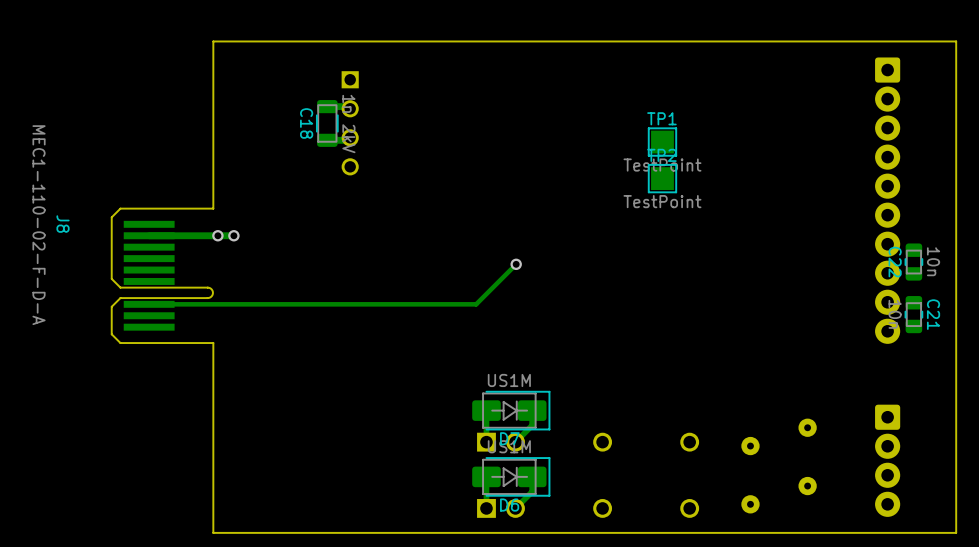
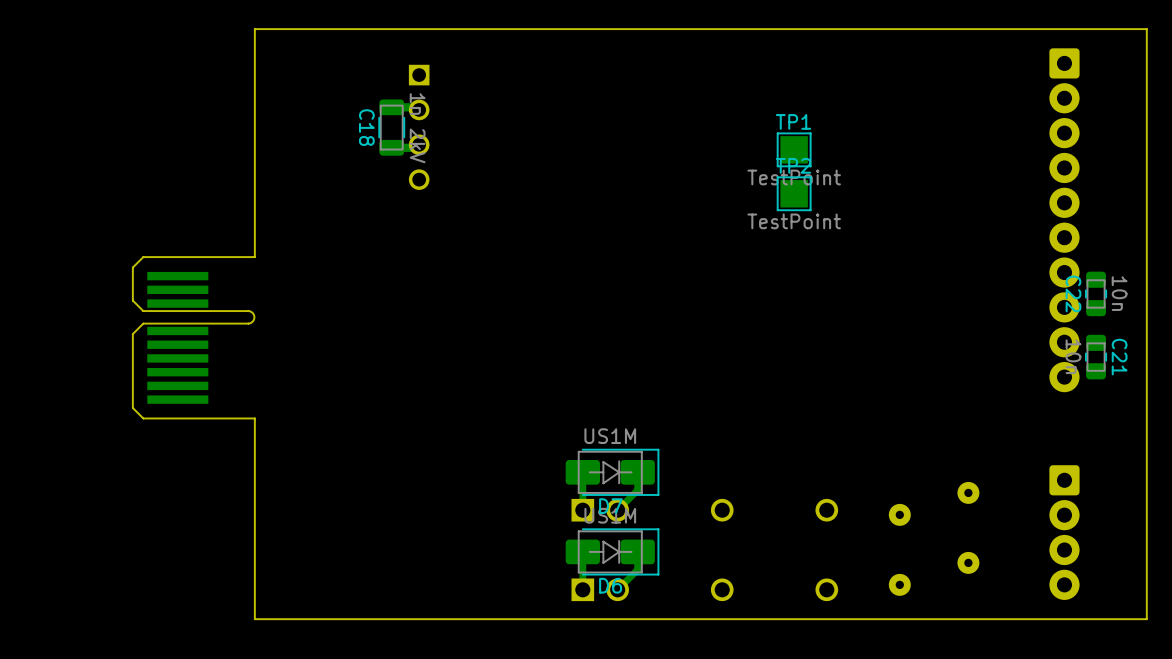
via: (217, 235) -> none
track: (233, 235) (149, 235) -> none
via: (233, 235) -> none
track: (516, 264) (476, 304) (149, 304) -> none
via: (516, 264) -> none
J8 side: bottom (162, 275) -> top (177, 337)
board edge: (213, 343) (213, 365) -> (254, 229) (254, 257) (143, 257) (132, 267) (132, 300) (143, 311) (248, 311) (252, 313) (254, 317) (252, 321) (248, 323) (143, 323) (132, 334) (132, 408) (143, 418) (254, 418)

